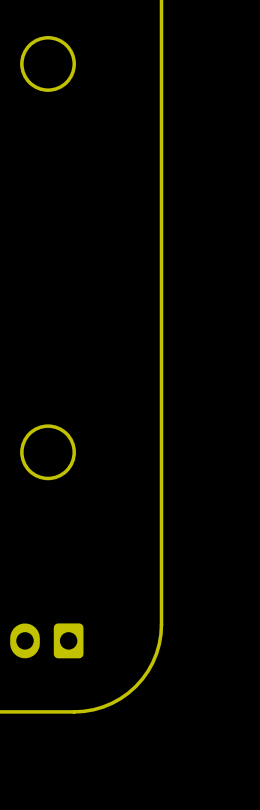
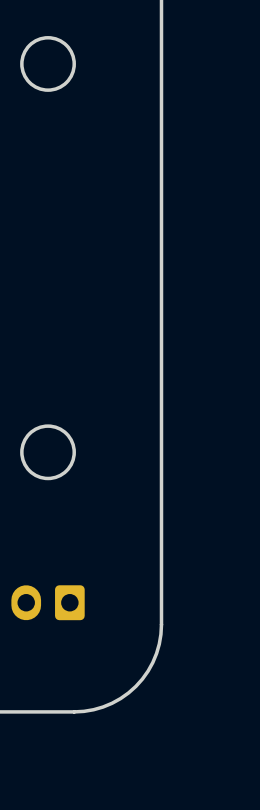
part position: (46, 640) -> (48, 602)

